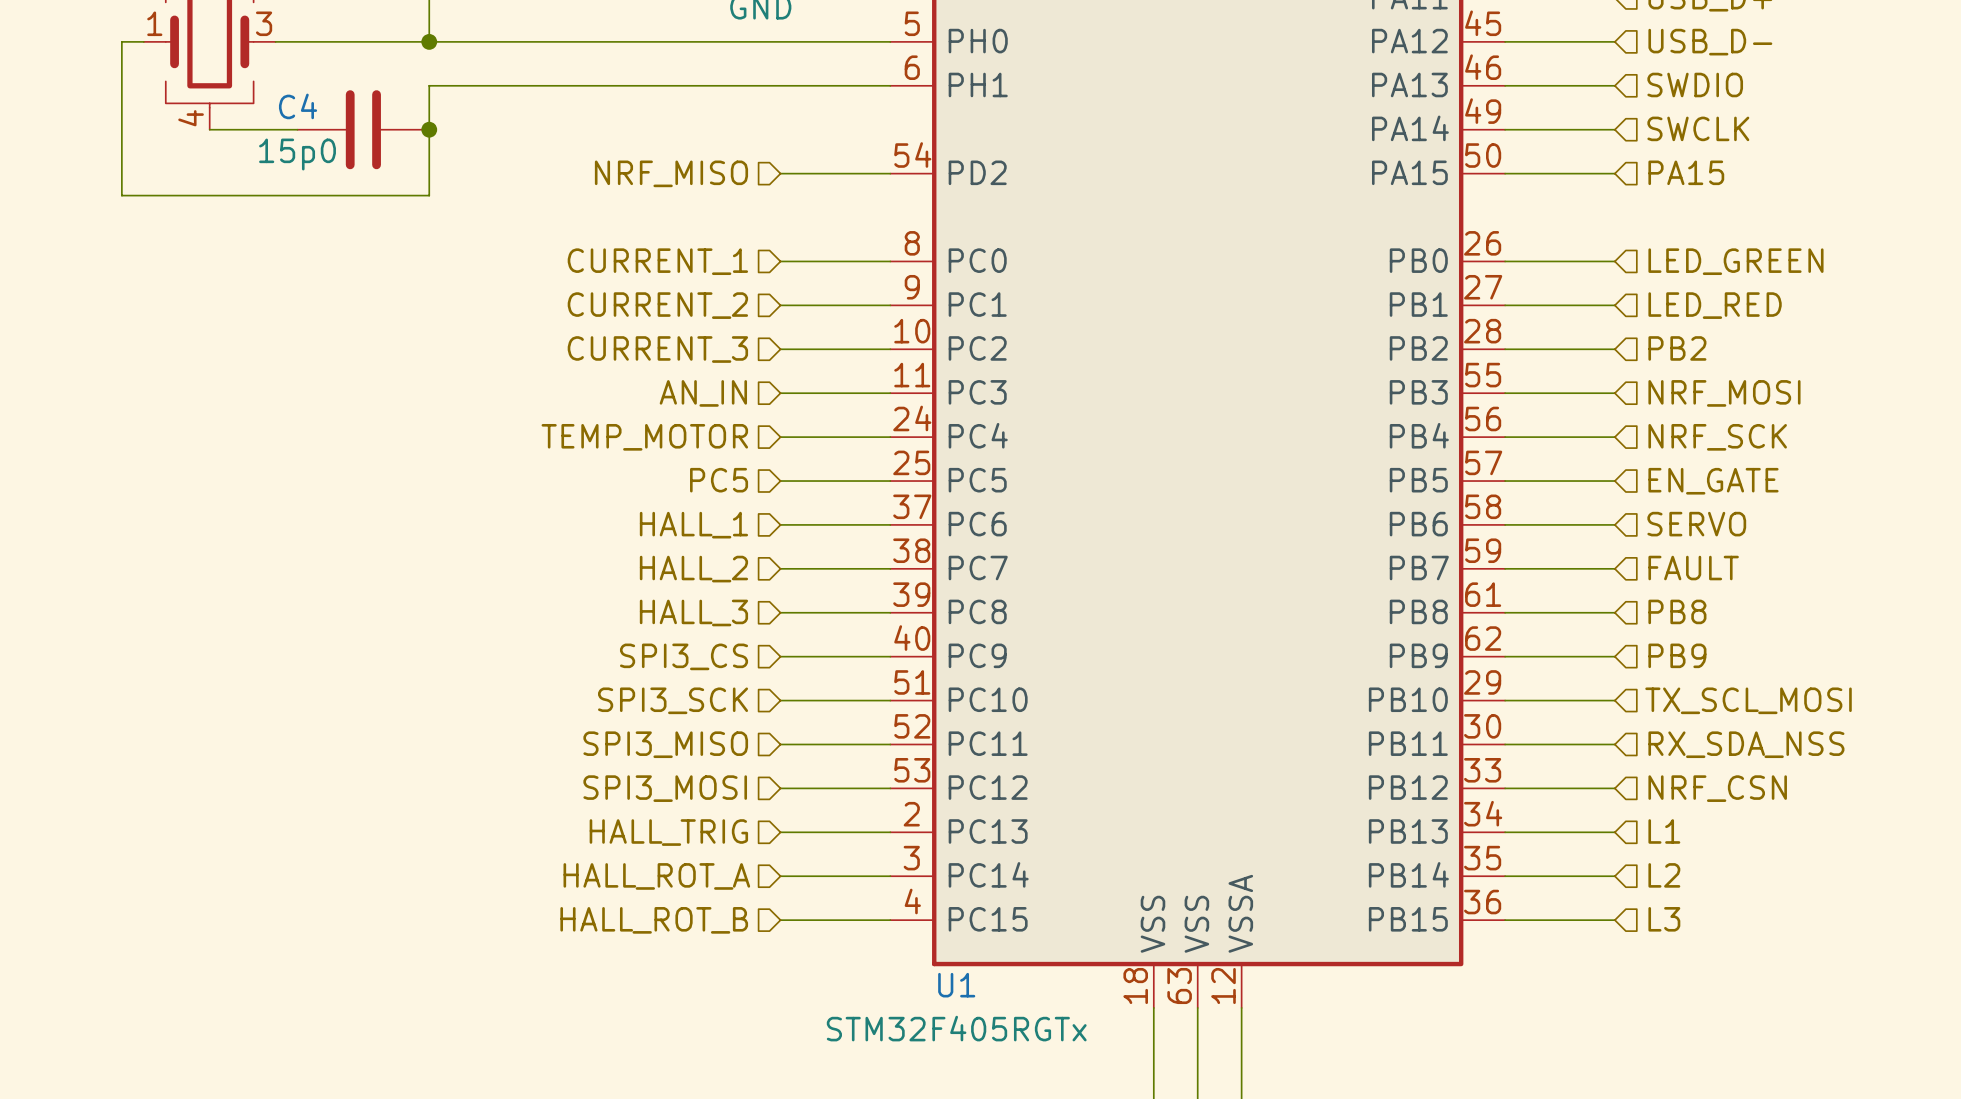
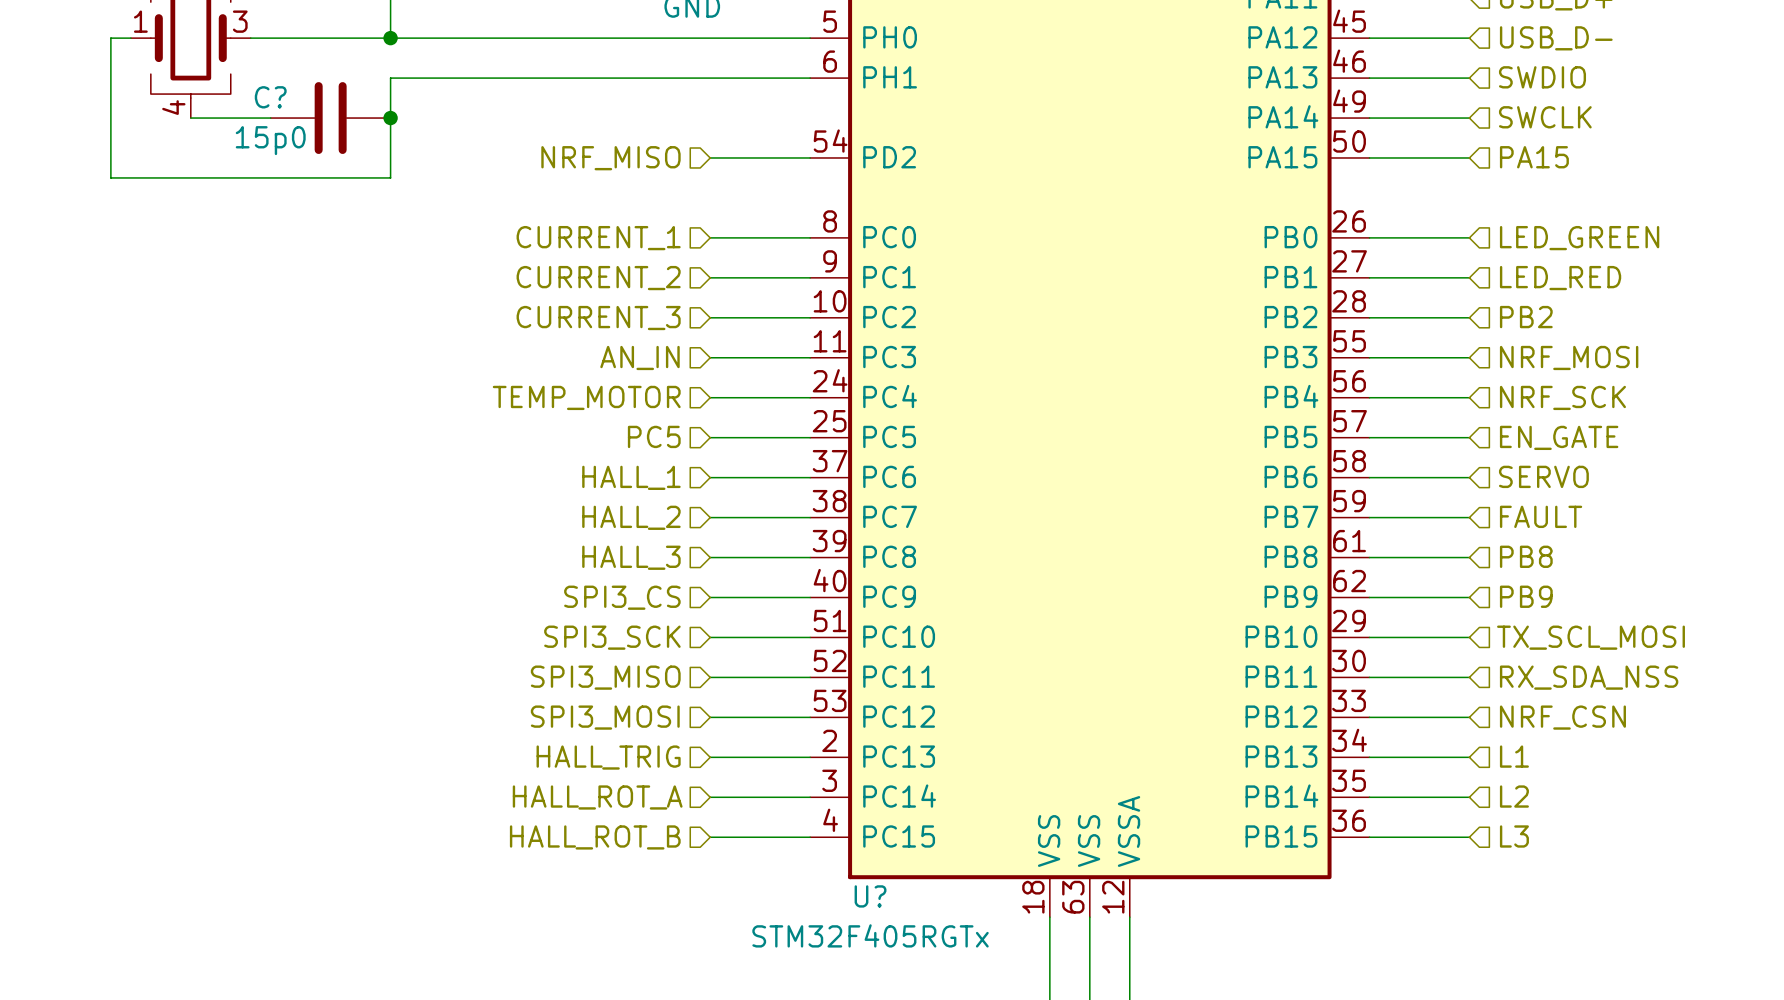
C4 name: C4 (298, 106) -> C? (270, 97)
U1 name: U1 (956, 985) -> U? (870, 896)

